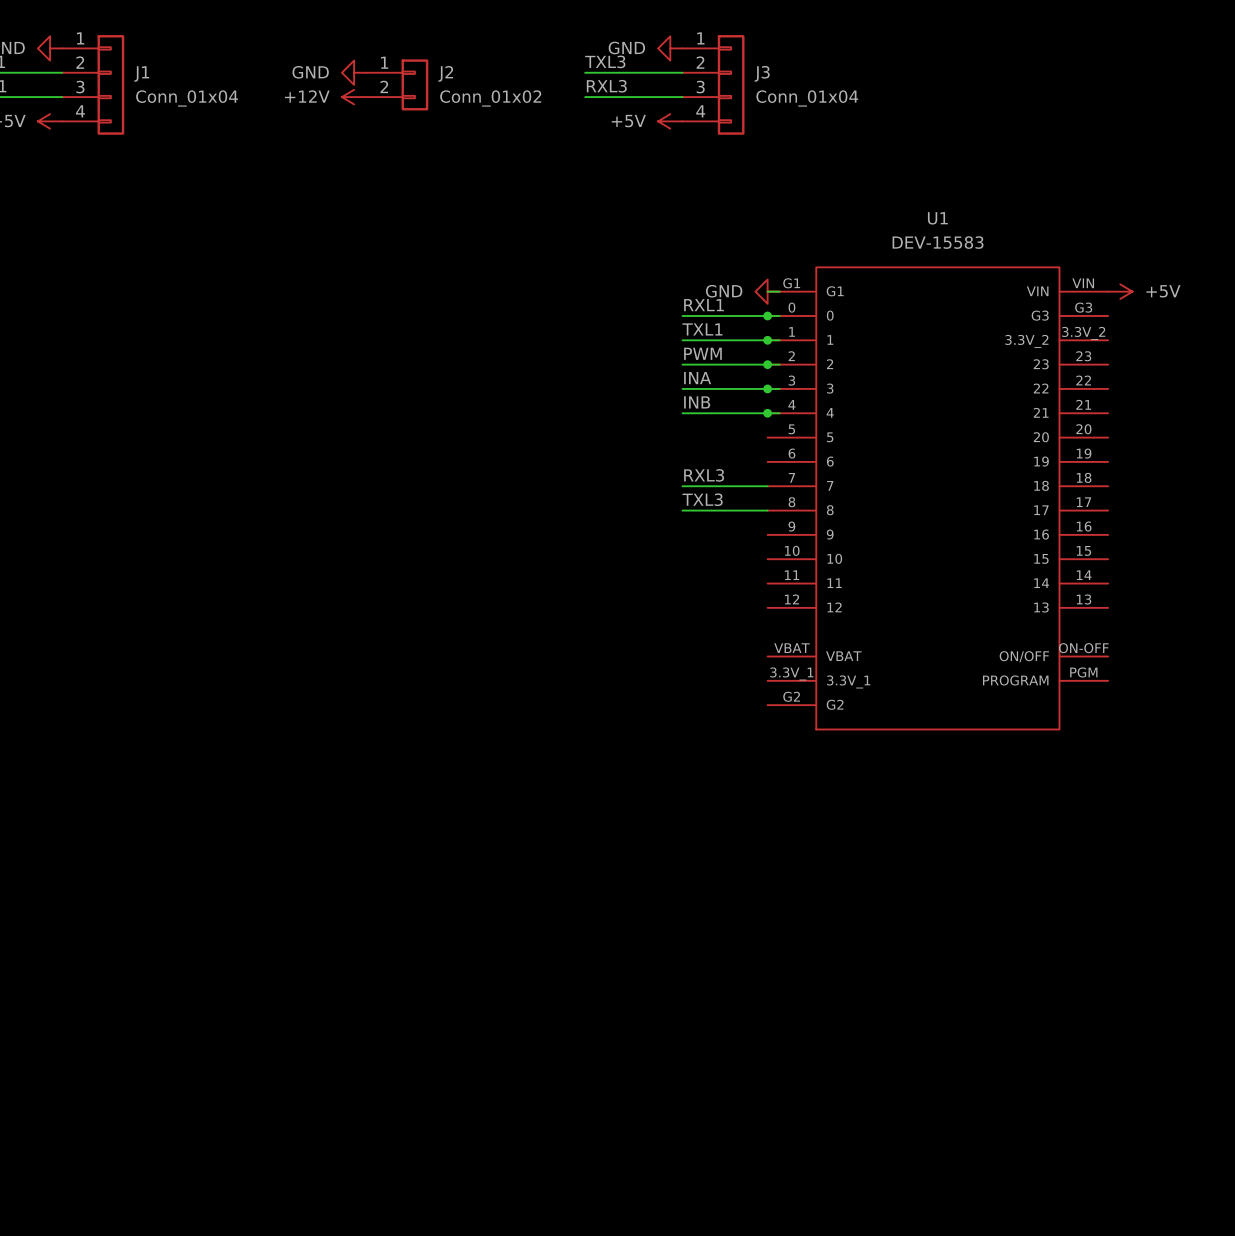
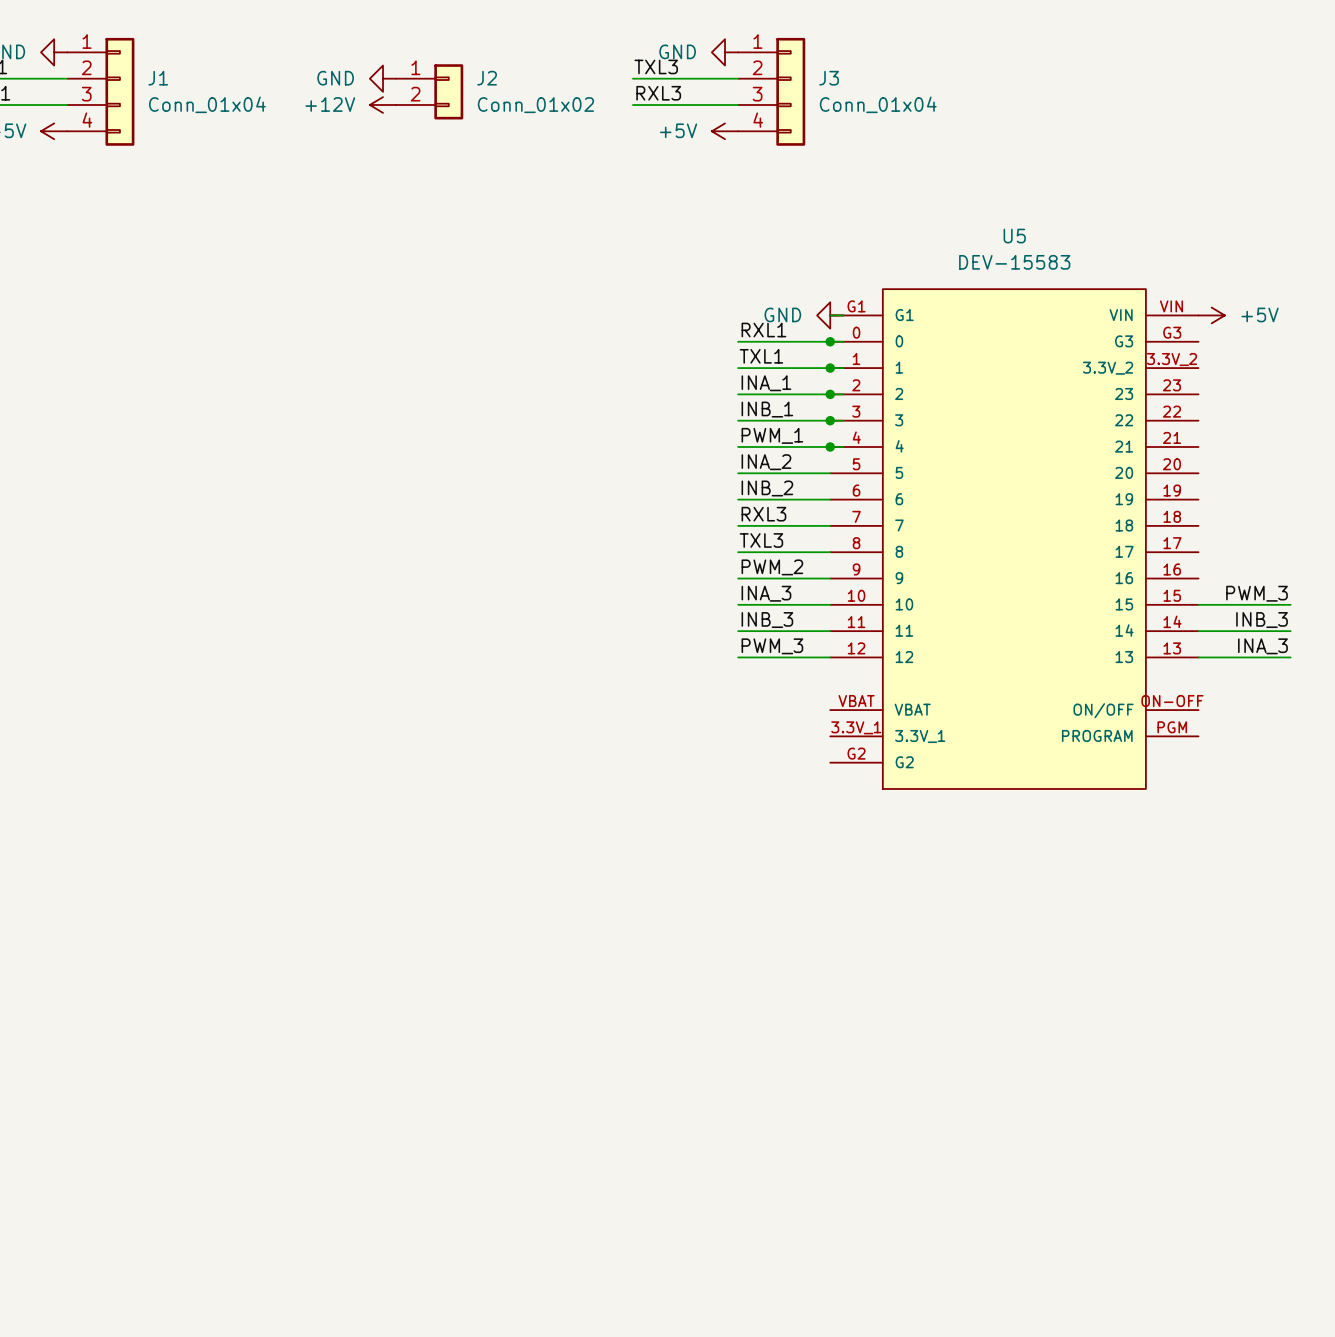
U1 name: U1 (937, 218) -> U5 (1014, 236)
label: PWM (702, 353) -> INA_1 (766, 383)
label: INA (697, 378) -> INB_1 (767, 409)
label: INB (697, 402) -> PWM_1 (772, 435)
label: none -> INA_2 (766, 462)
wire: none -> (738, 473) (830, 473)
label: none -> INB_2 (767, 488)
wire: none -> (738, 499) (830, 499)
label: none -> PWM_2 (772, 567)
wire: none -> (738, 578) (830, 578)
label: none -> INA_3 (766, 593)
label: none -> PWM_3 (1257, 593)
wire: none -> (738, 604) (830, 604)
wire: none -> (1198, 604) (1290, 604)
label: none -> INB_3 (767, 620)
label: none -> INB_3 (1262, 620)
wire: none -> (738, 631) (830, 631)
wire: none -> (1198, 631) (1290, 631)
label: none -> PWM_3 (772, 646)
label: none -> INA_3 (1262, 646)
wire: none -> (738, 657) (830, 657)
wire: none -> (1198, 657) (1290, 657)

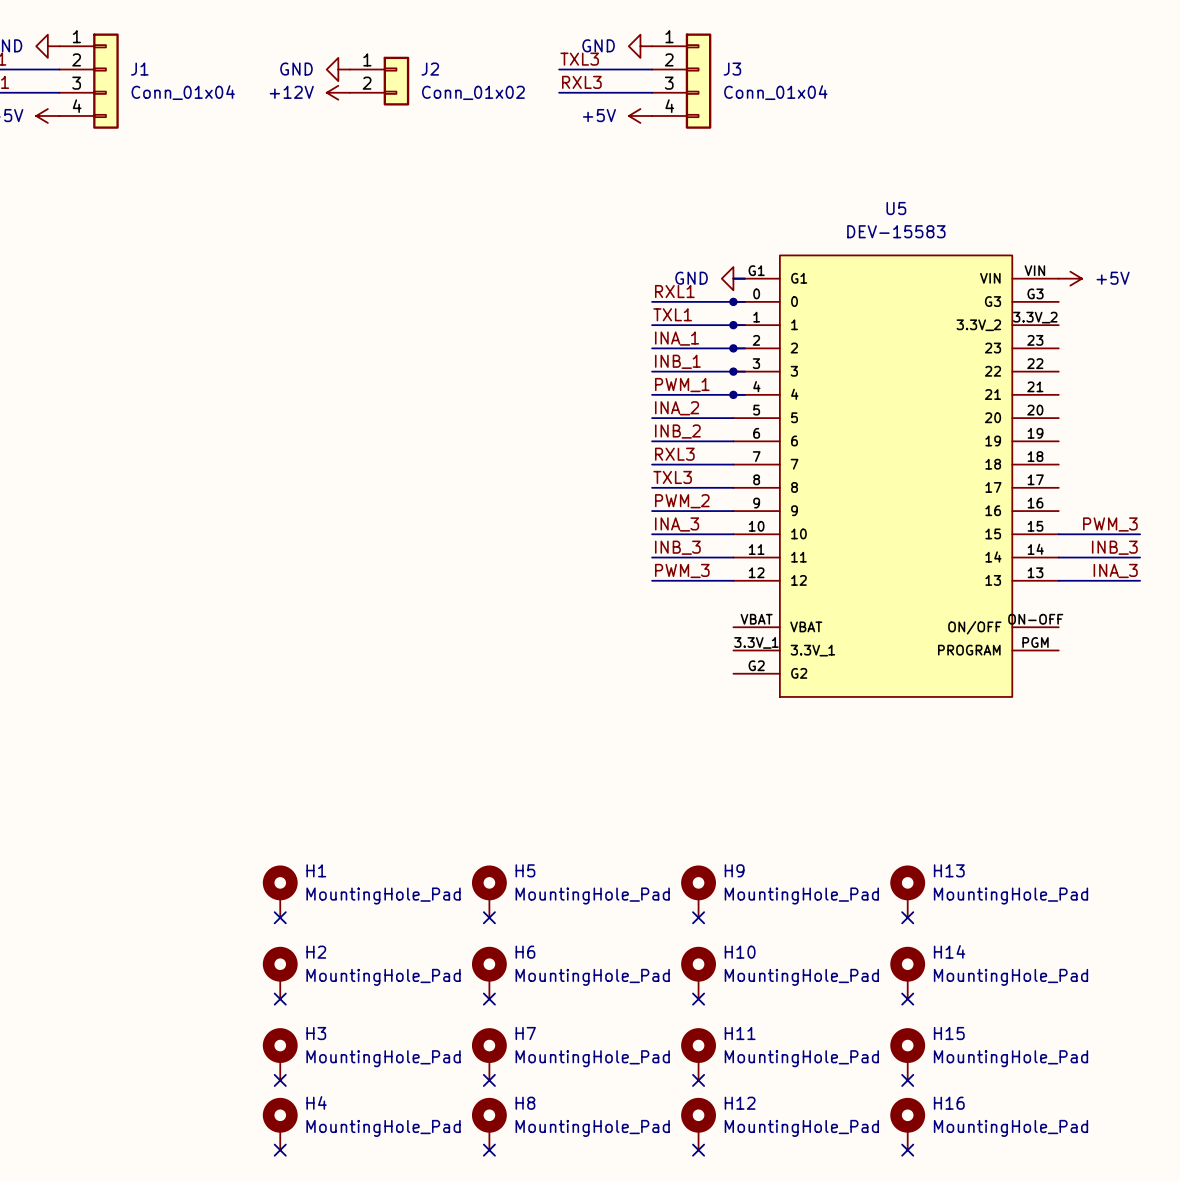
H1: none -> MountingHole_Pad (280, 891)
H5: none -> MountingHole_Pad (489, 891)
H9: none -> MountingHole_Pad (698, 891)
H13: none -> MountingHole_Pad (907, 891)
no-connect mark: none -> (280, 917)
no-connect mark: none -> (489, 917)
no-connect mark: none -> (698, 917)
no-connect mark: none -> (907, 917)
H2: none -> MountingHole_Pad (280, 972)
H6: none -> MountingHole_Pad (489, 972)
H10: none -> MountingHole_Pad (698, 972)
H14: none -> MountingHole_Pad (907, 972)
no-connect mark: none -> (280, 999)
no-connect mark: none -> (489, 999)
no-connect mark: none -> (698, 999)
no-connect mark: none -> (907, 999)
H3: none -> MountingHole_Pad (280, 1054)
H7: none -> MountingHole_Pad (489, 1054)
H11: none -> MountingHole_Pad (698, 1054)
H15: none -> MountingHole_Pad (907, 1054)
no-connect mark: none -> (280, 1080)
no-connect mark: none -> (489, 1080)
no-connect mark: none -> (698, 1080)
no-connect mark: none -> (907, 1080)
H4: none -> MountingHole_Pad (280, 1123)
H8: none -> MountingHole_Pad (489, 1123)
H12: none -> MountingHole_Pad (698, 1123)
H16: none -> MountingHole_Pad (907, 1123)
no-connect mark: none -> (280, 1150)
no-connect mark: none -> (489, 1150)
no-connect mark: none -> (698, 1150)
no-connect mark: none -> (907, 1150)

